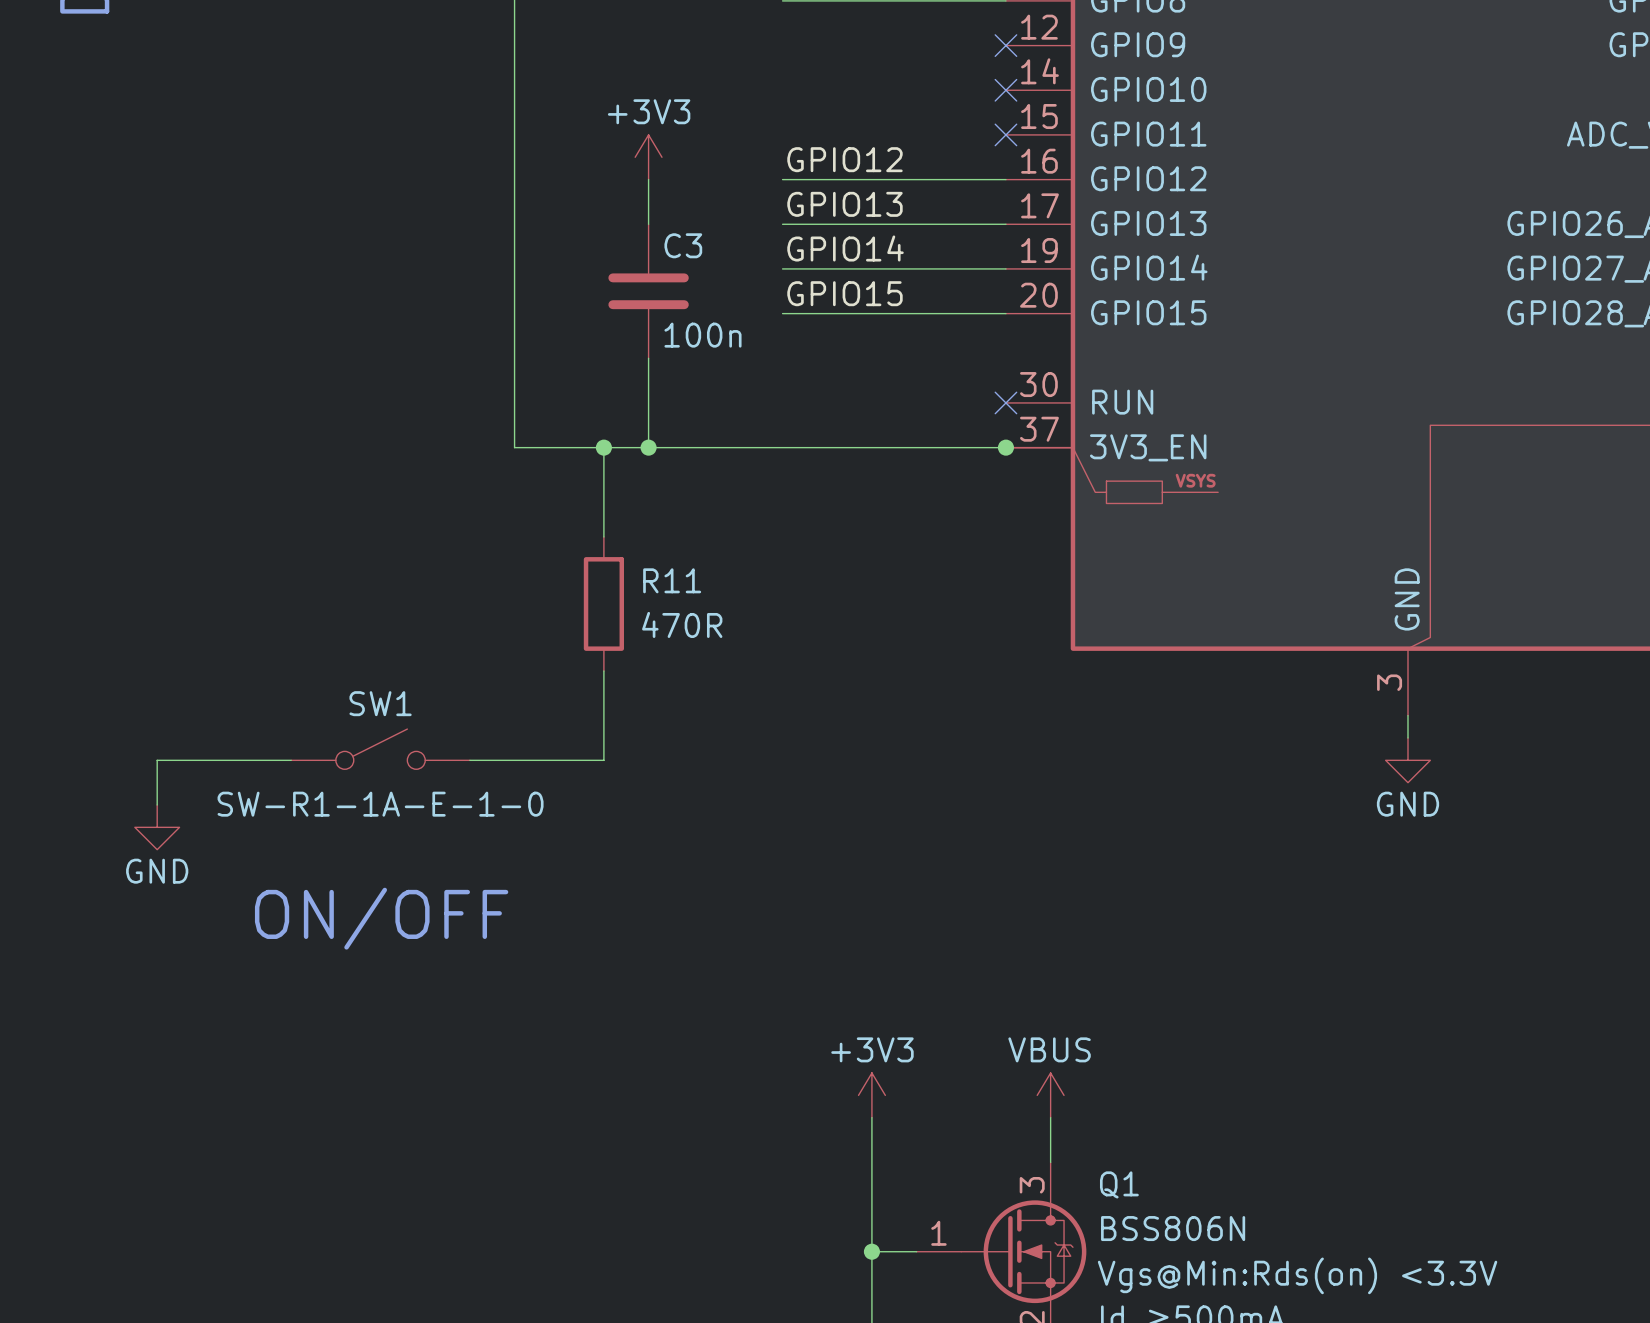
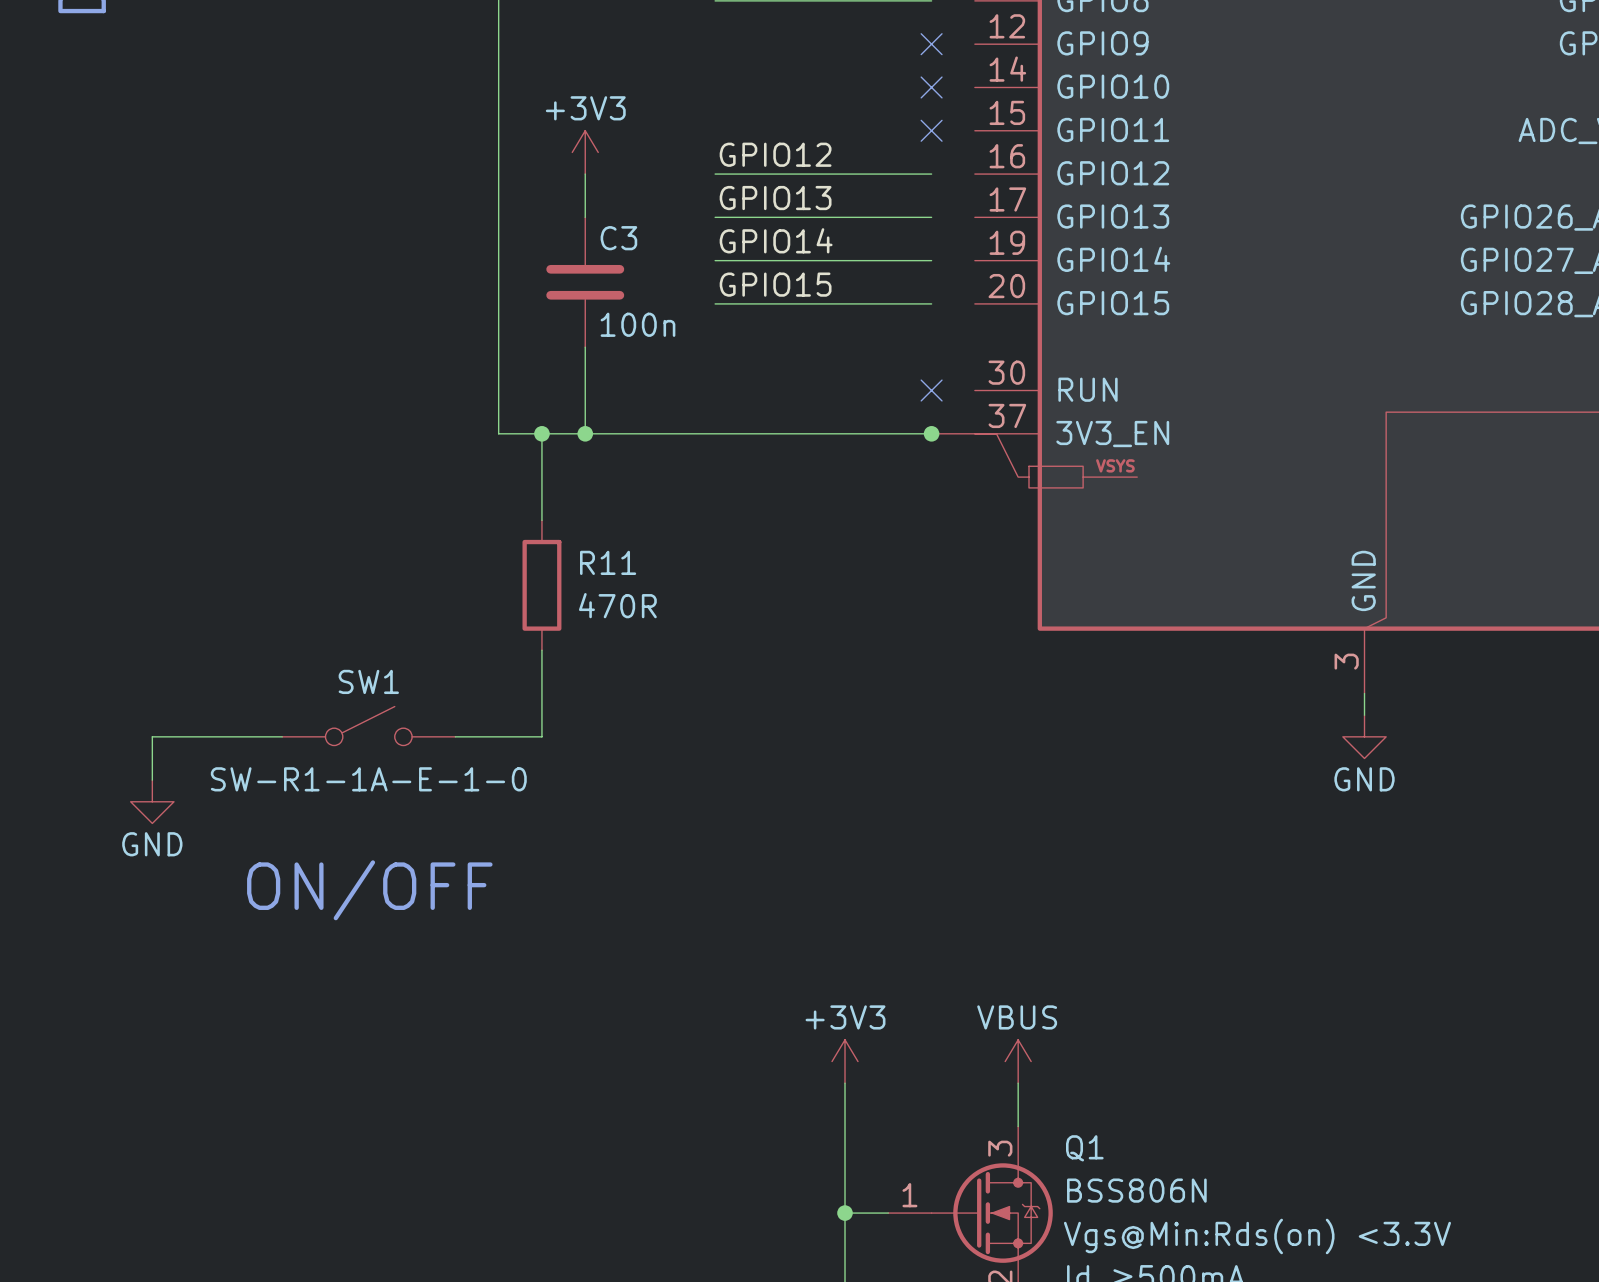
wire: (961, 0) (1005, 0) -> (715, 0) (758, 0)
no-connect mark: none -> (931, 44)
no-connect mark: (1005, 45) -> none
no-connect mark: none -> (931, 87)
no-connect mark: (1005, 90) -> none
no-connect mark: none -> (931, 130)
no-connect mark: (1005, 134) -> none
power symbol position: +3V3 (648, 157) -> +3V3 (585, 152)
label position: GPIO12 (844, 159) -> GPIO12 (775, 154)
wire: (648, 179) (648, 224) -> (585, 174) (585, 217)
wire: (961, 179) (1005, 179) -> (715, 174) (758, 174)
label position: GPIO13 (844, 204) -> GPIO13 (775, 198)
wire: (961, 224) (1005, 224) -> (715, 217) (758, 217)
label position: GPIO14 (845, 248) -> GPIO14 (776, 240)
wire: (961, 268) (1005, 268) -> (715, 260) (758, 260)
C3 position: (648, 291) -> (585, 282)
label position: GPIO15 (844, 293) -> GPIO15 (775, 284)
wire: (961, 313) (1005, 313) -> (715, 303) (758, 303)
wire: (648, 358) (648, 447) -> (541, 433) (541, 520)
no-connect mark position: (1005, 402) -> (931, 390)
wire: (603, 447) (603, 536) -> (585, 433) (585, 347)
junction position: (648, 447) -> (541, 433)
junction position: (1005, 447) -> (931, 433)
power symbol position: (1112, 475) -> (1034, 460)
R11 position: (603, 603) -> (541, 585)
wire: (603, 670) (603, 760) (559, 760) -> (541, 650) (541, 736)

